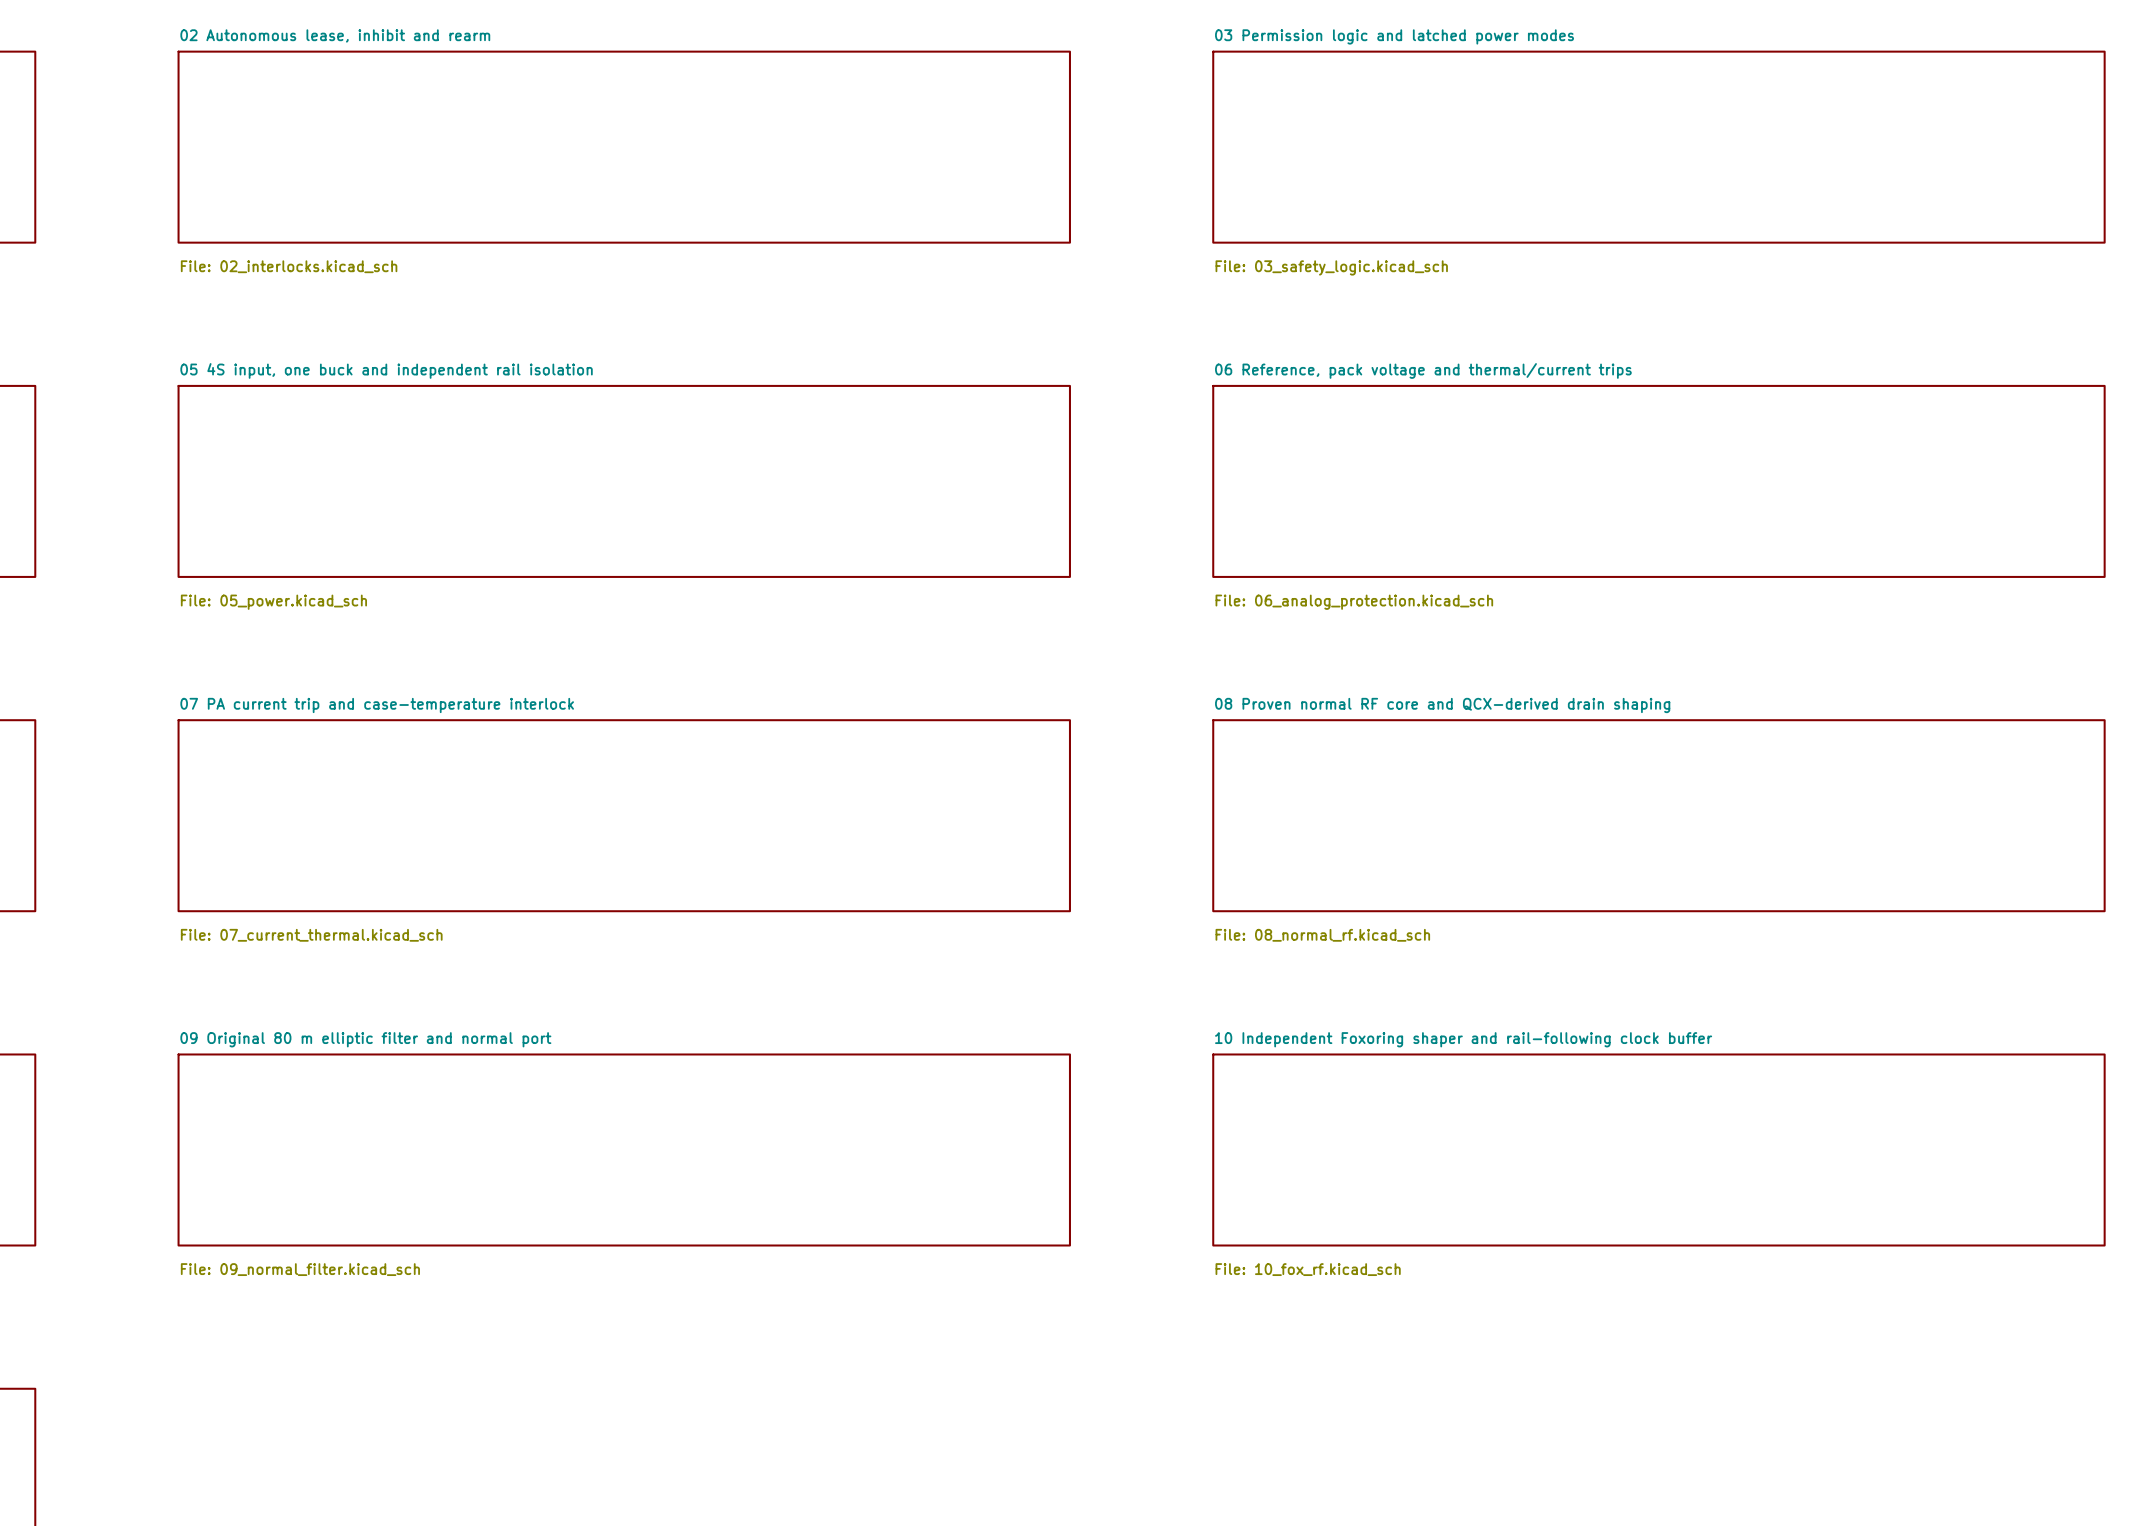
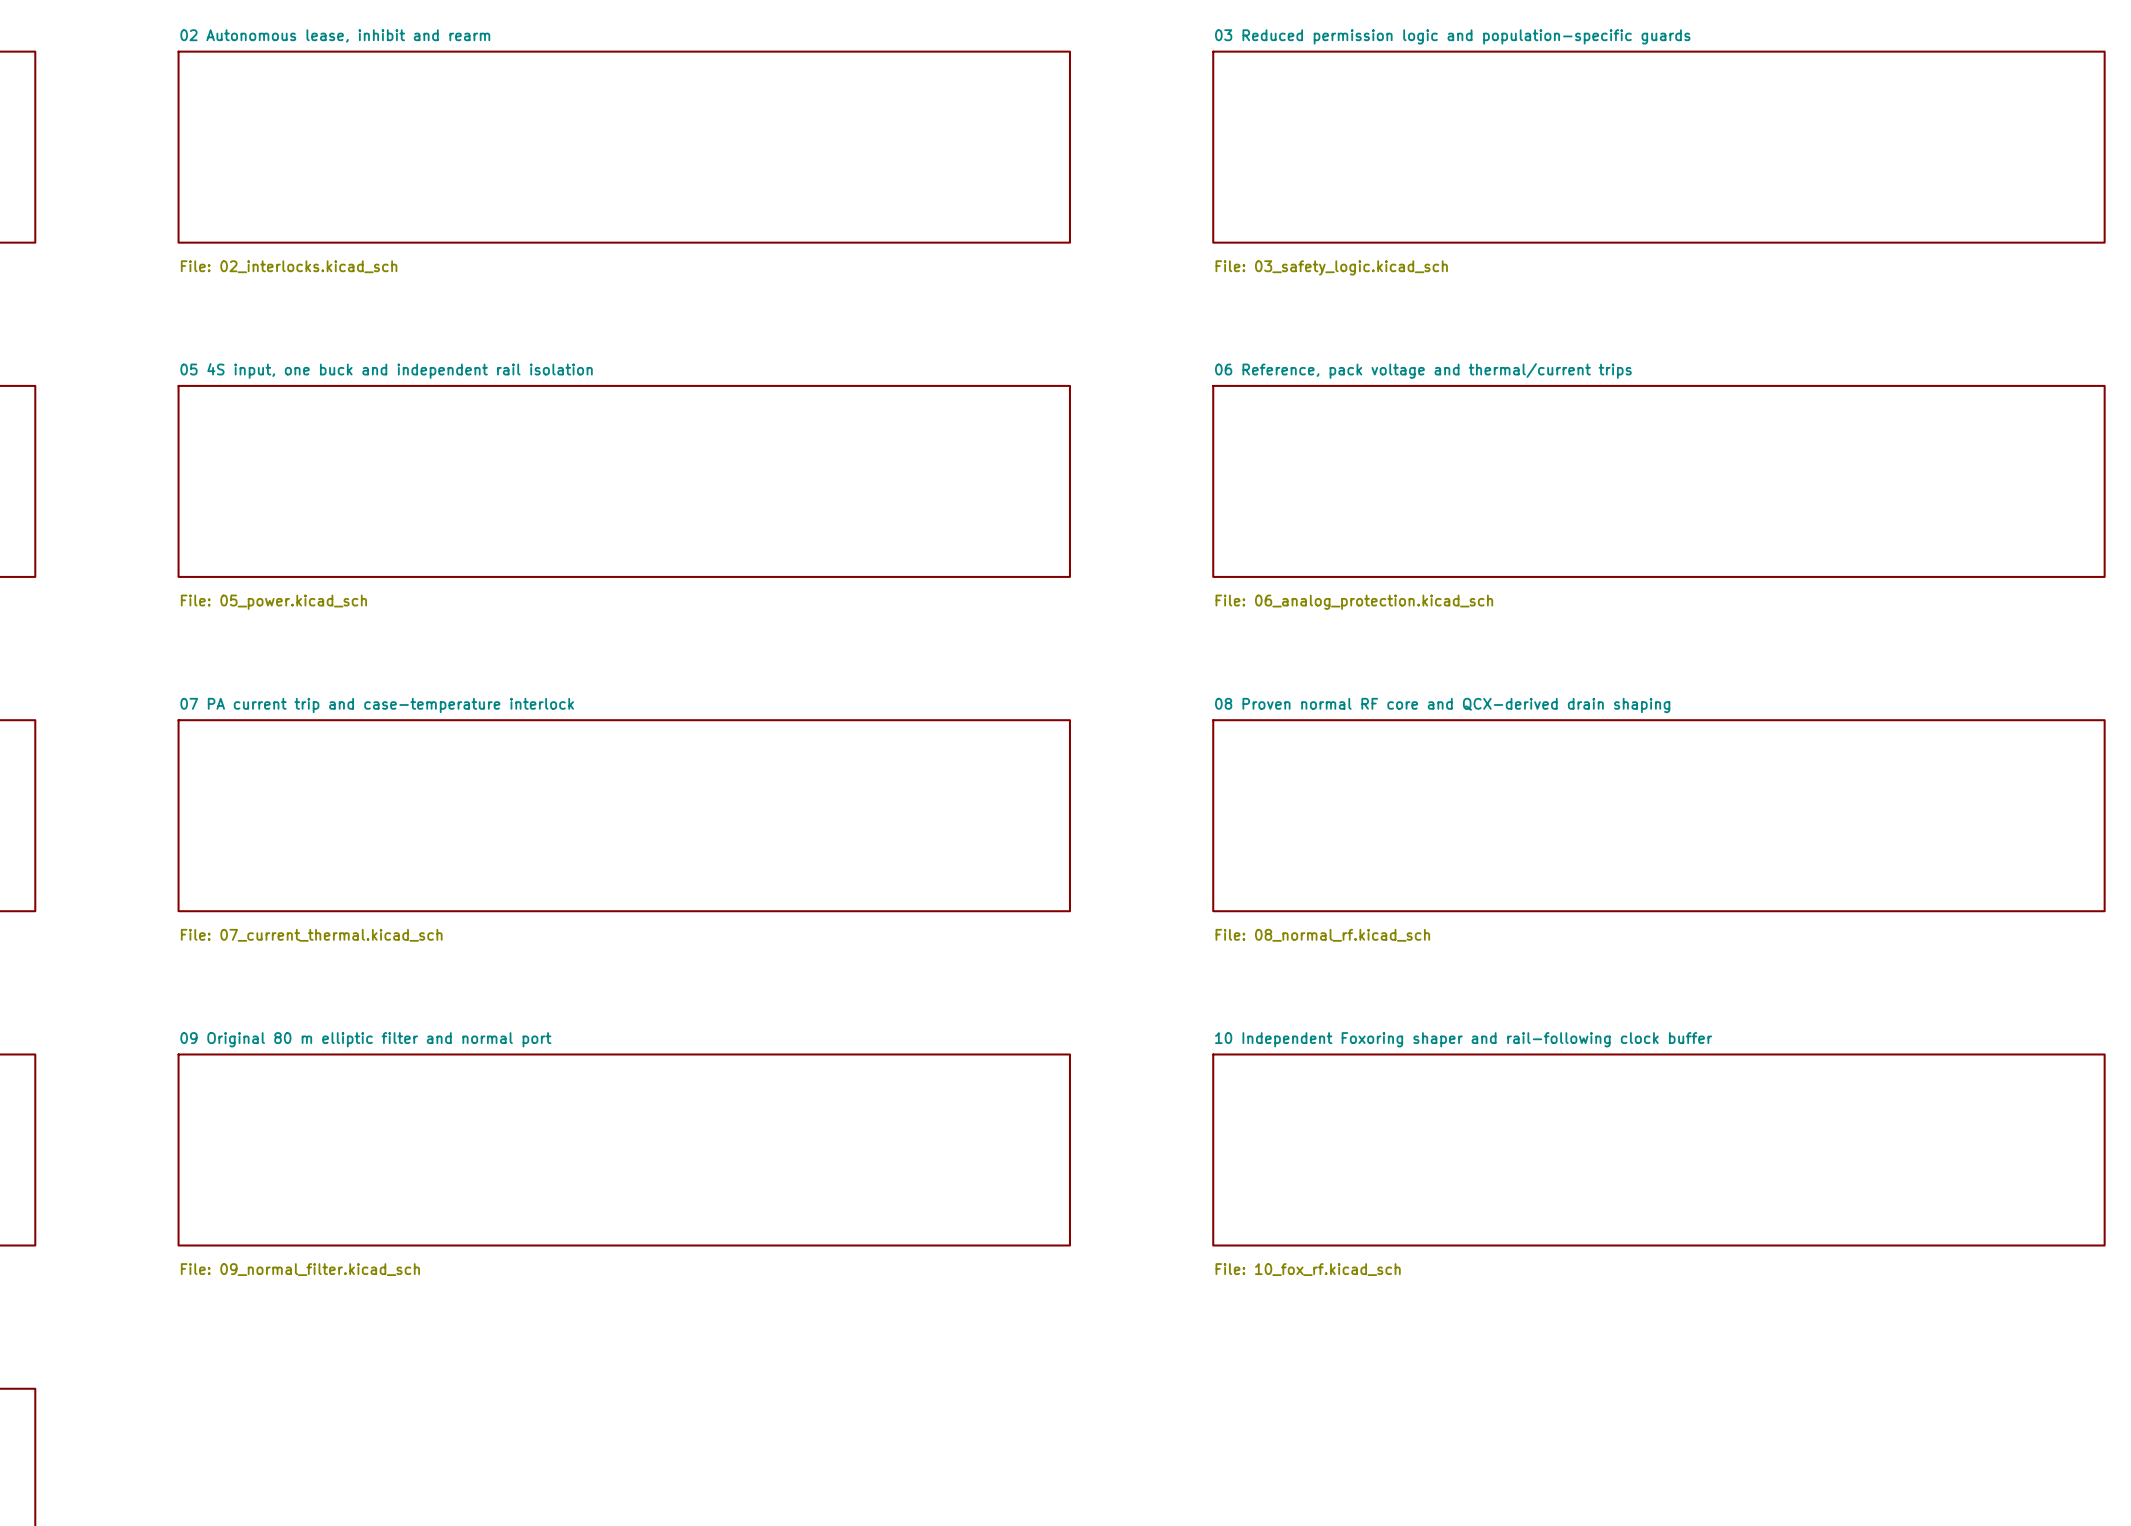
sheet 03 Permission logic and latched power modes name: 03 Permission logic and latched power modes (1394, 36) -> 03 Reduced permission logic and population-specific guards (1452, 36)

